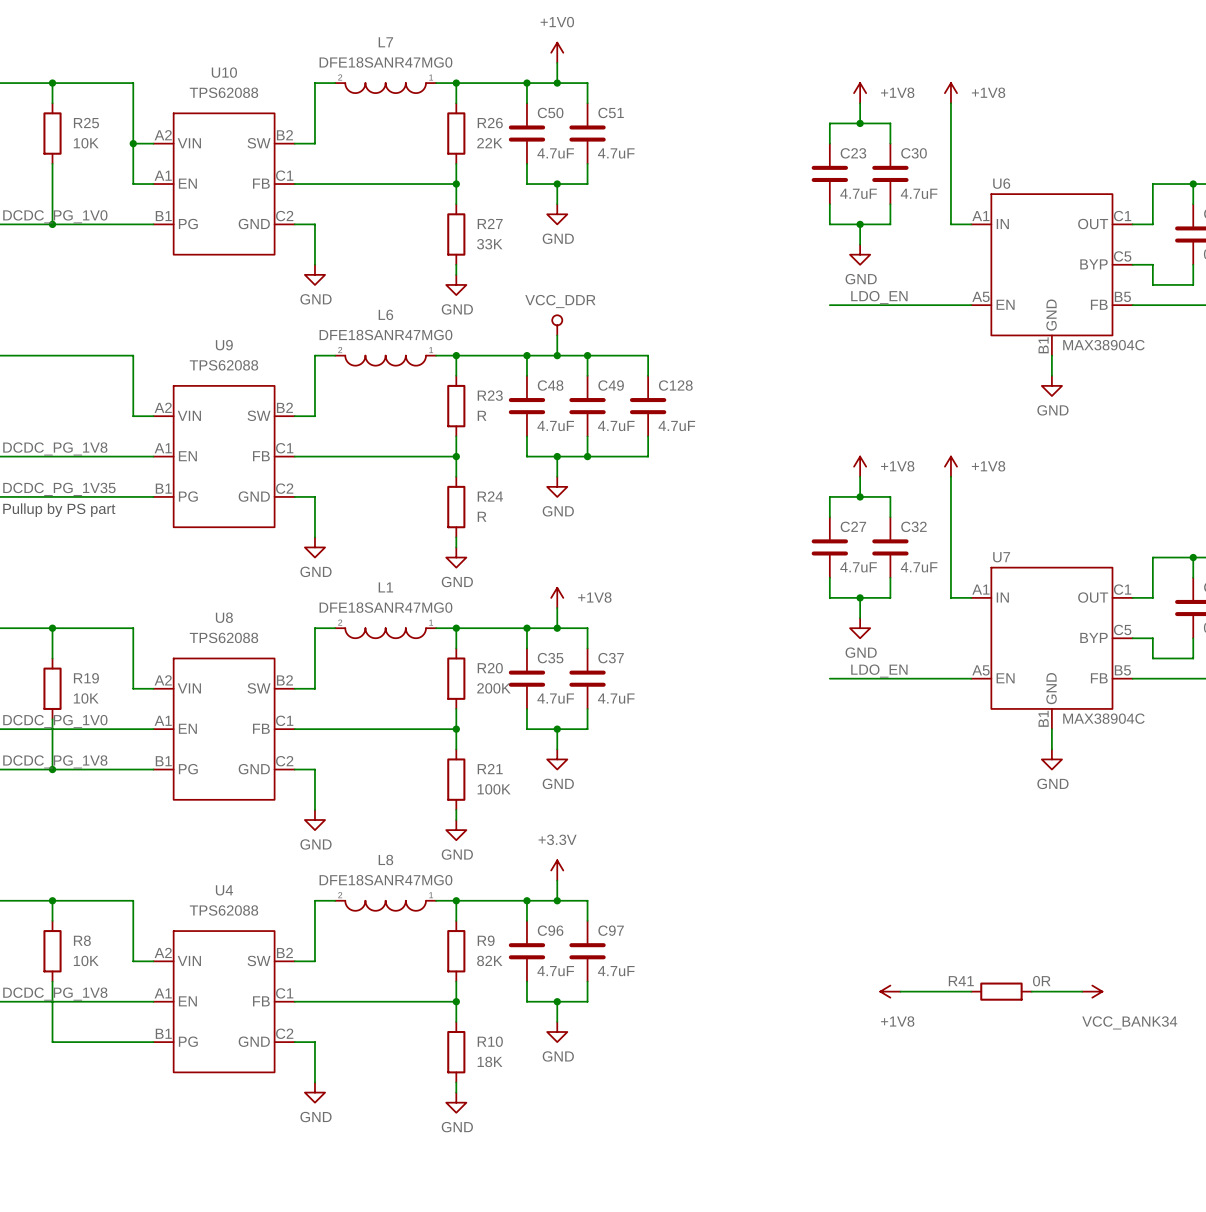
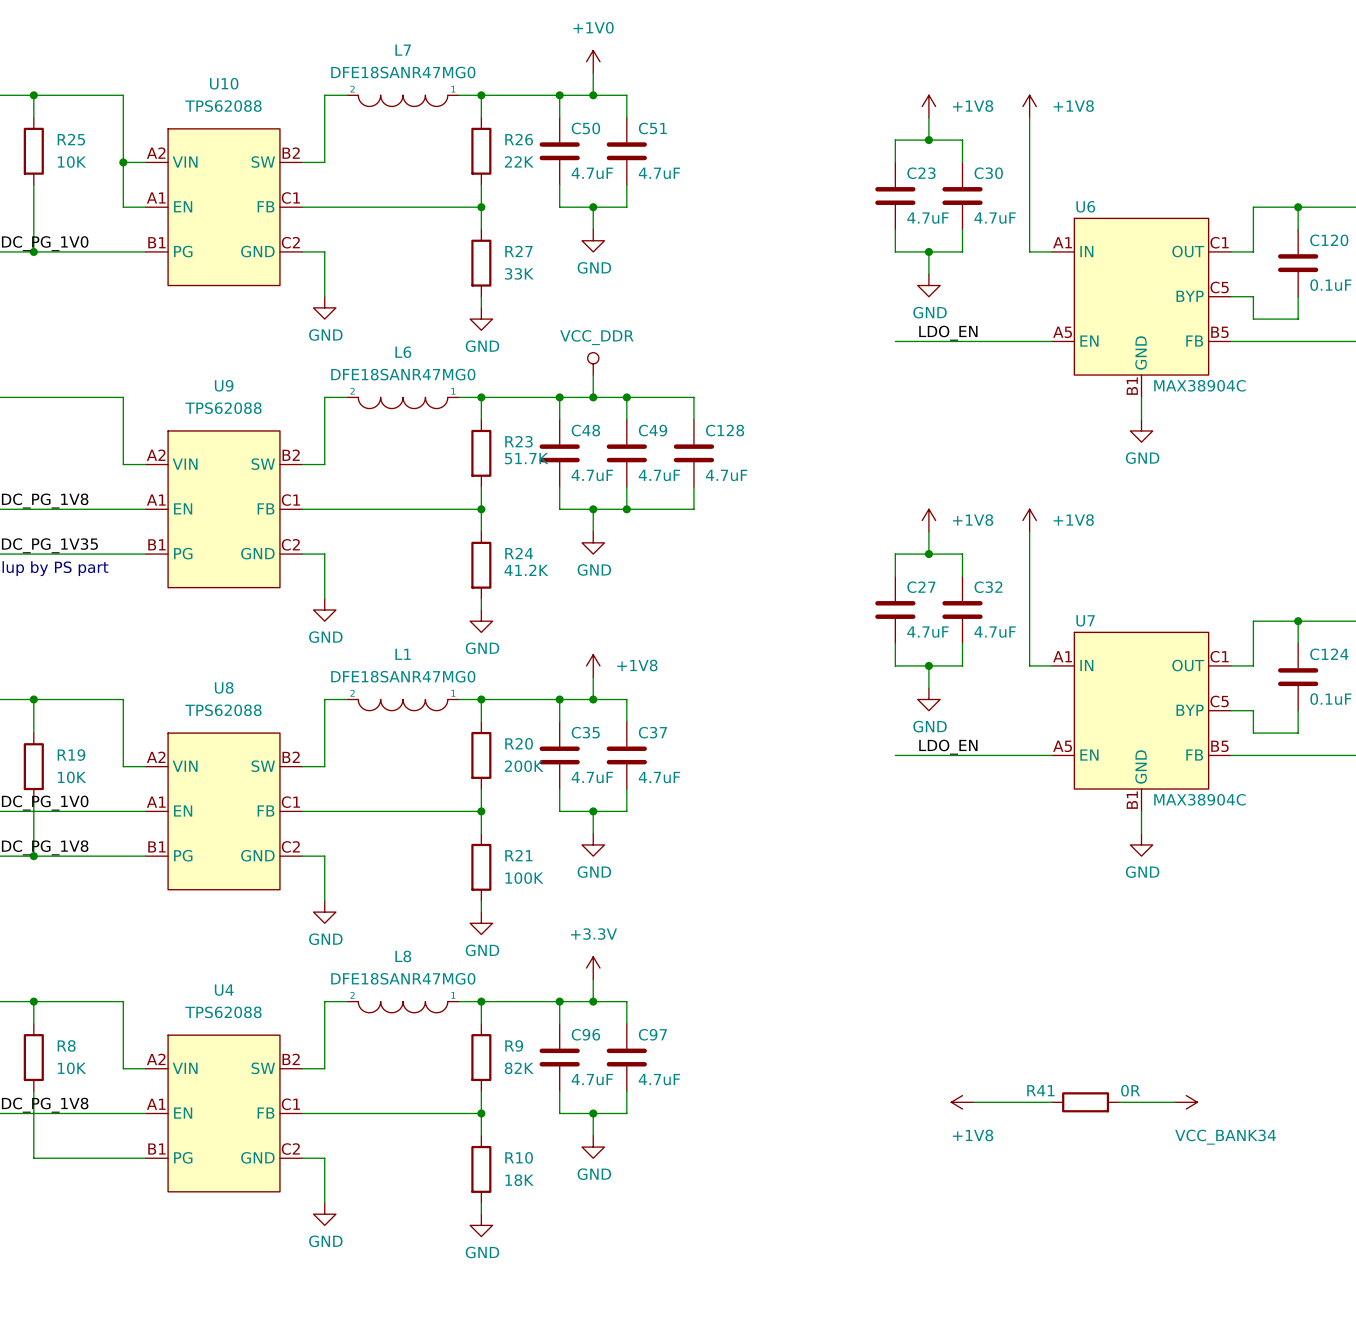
R23 value: R (482, 415) -> 51.7K (526, 458)
R24 value: R (482, 516) -> 41.2K (526, 570)

